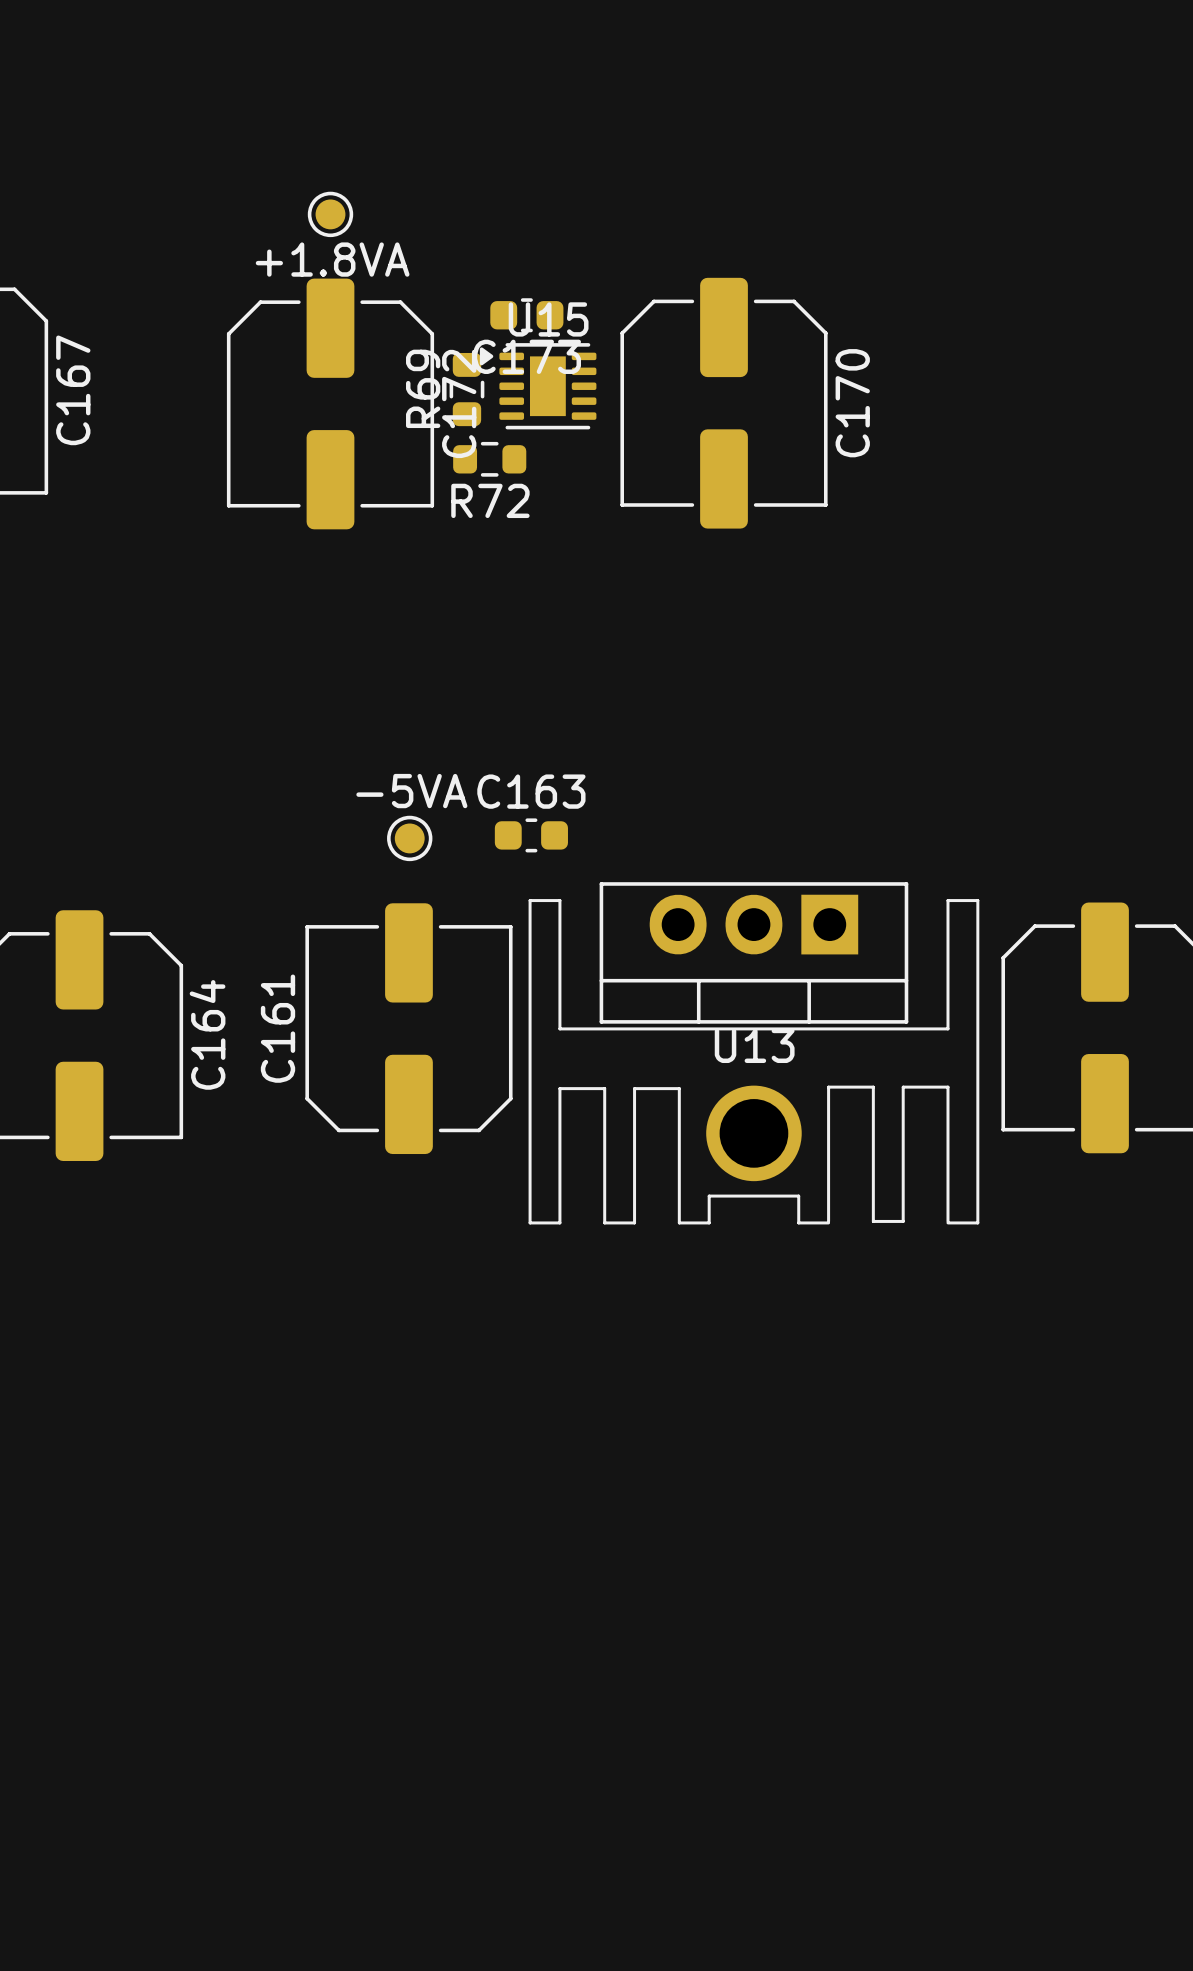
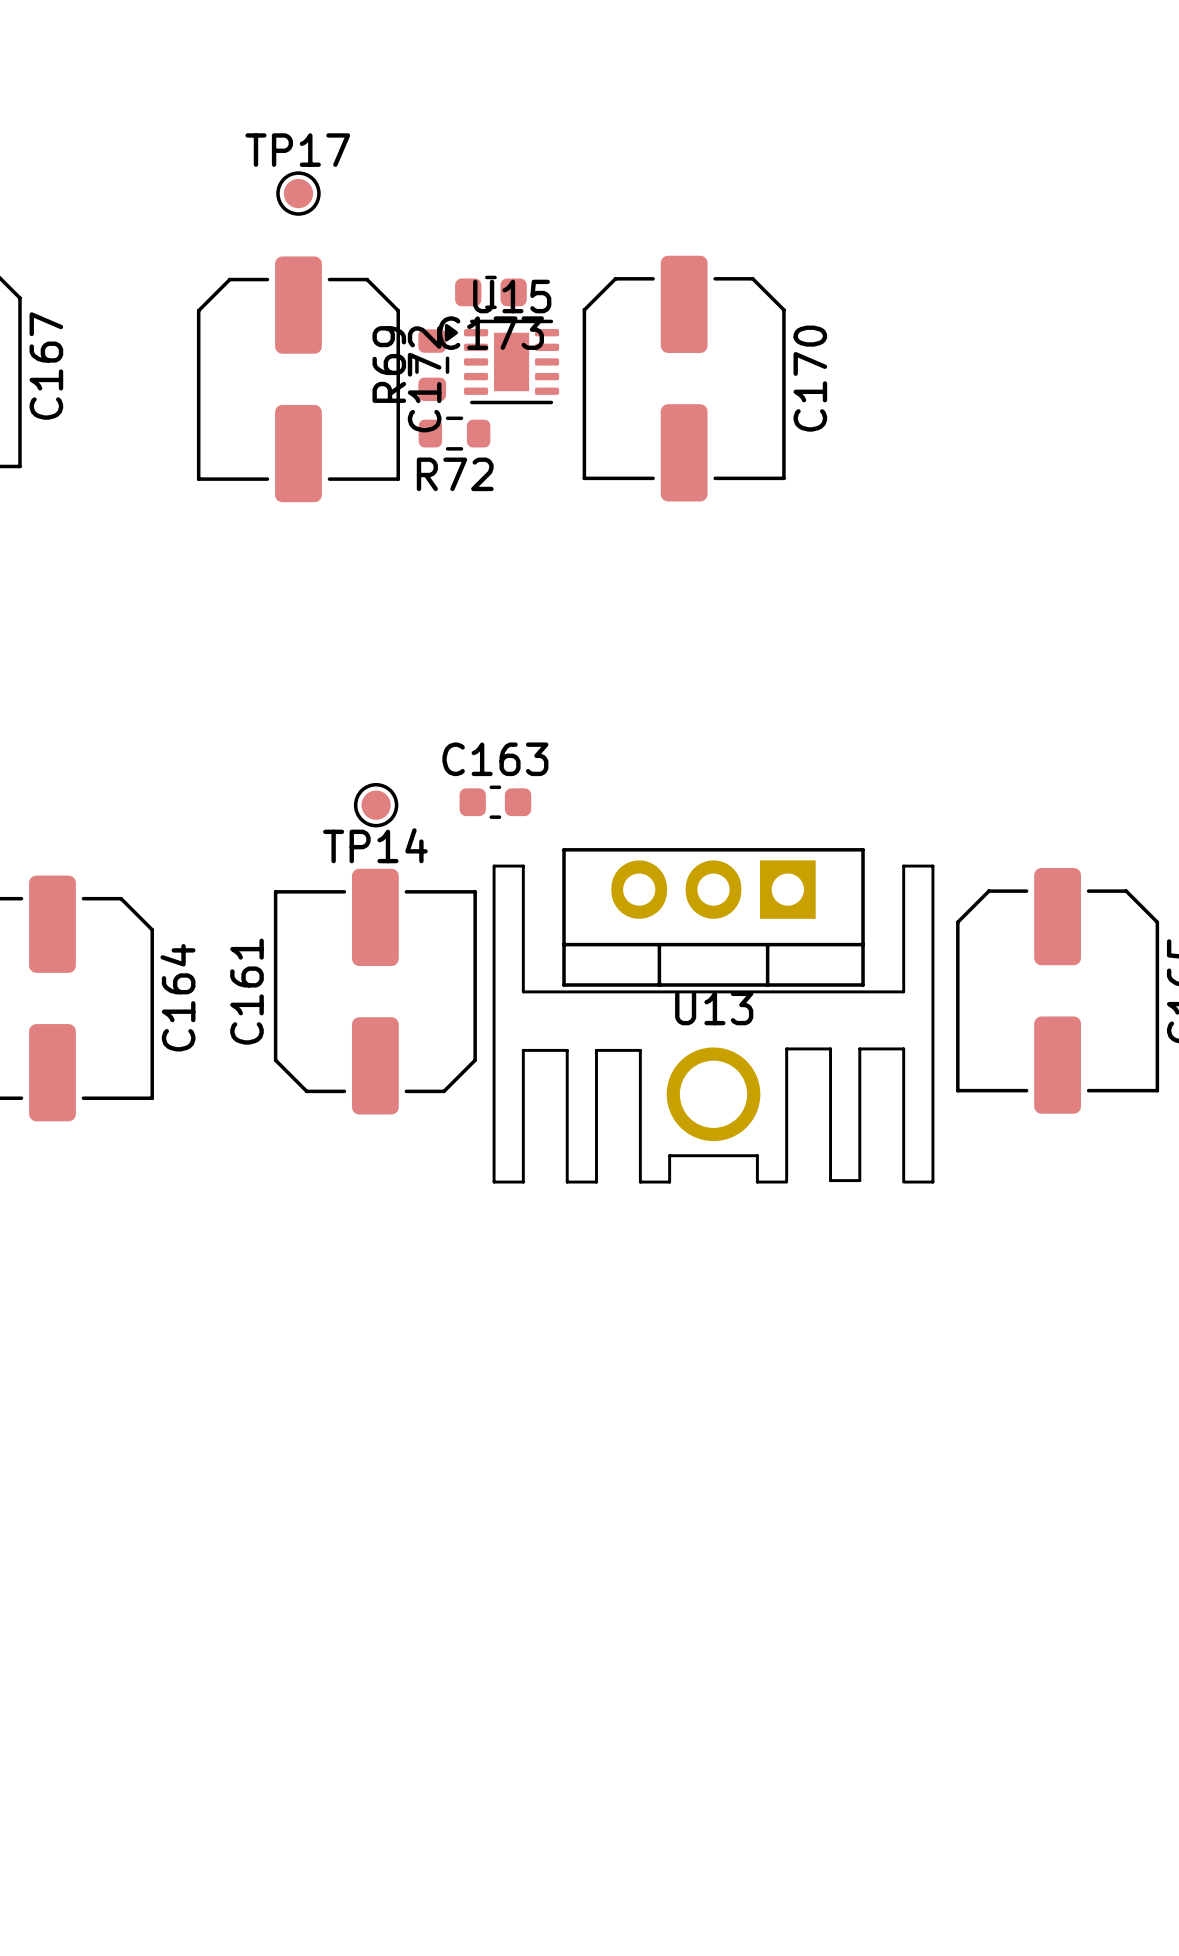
TP17 name: none -> TP17 (297, 150)
TP17 value: +1.8VA (332, 259) -> none
TP14 value: -5VA (411, 791) -> none
TP14 name: none -> TP14 (375, 845)

